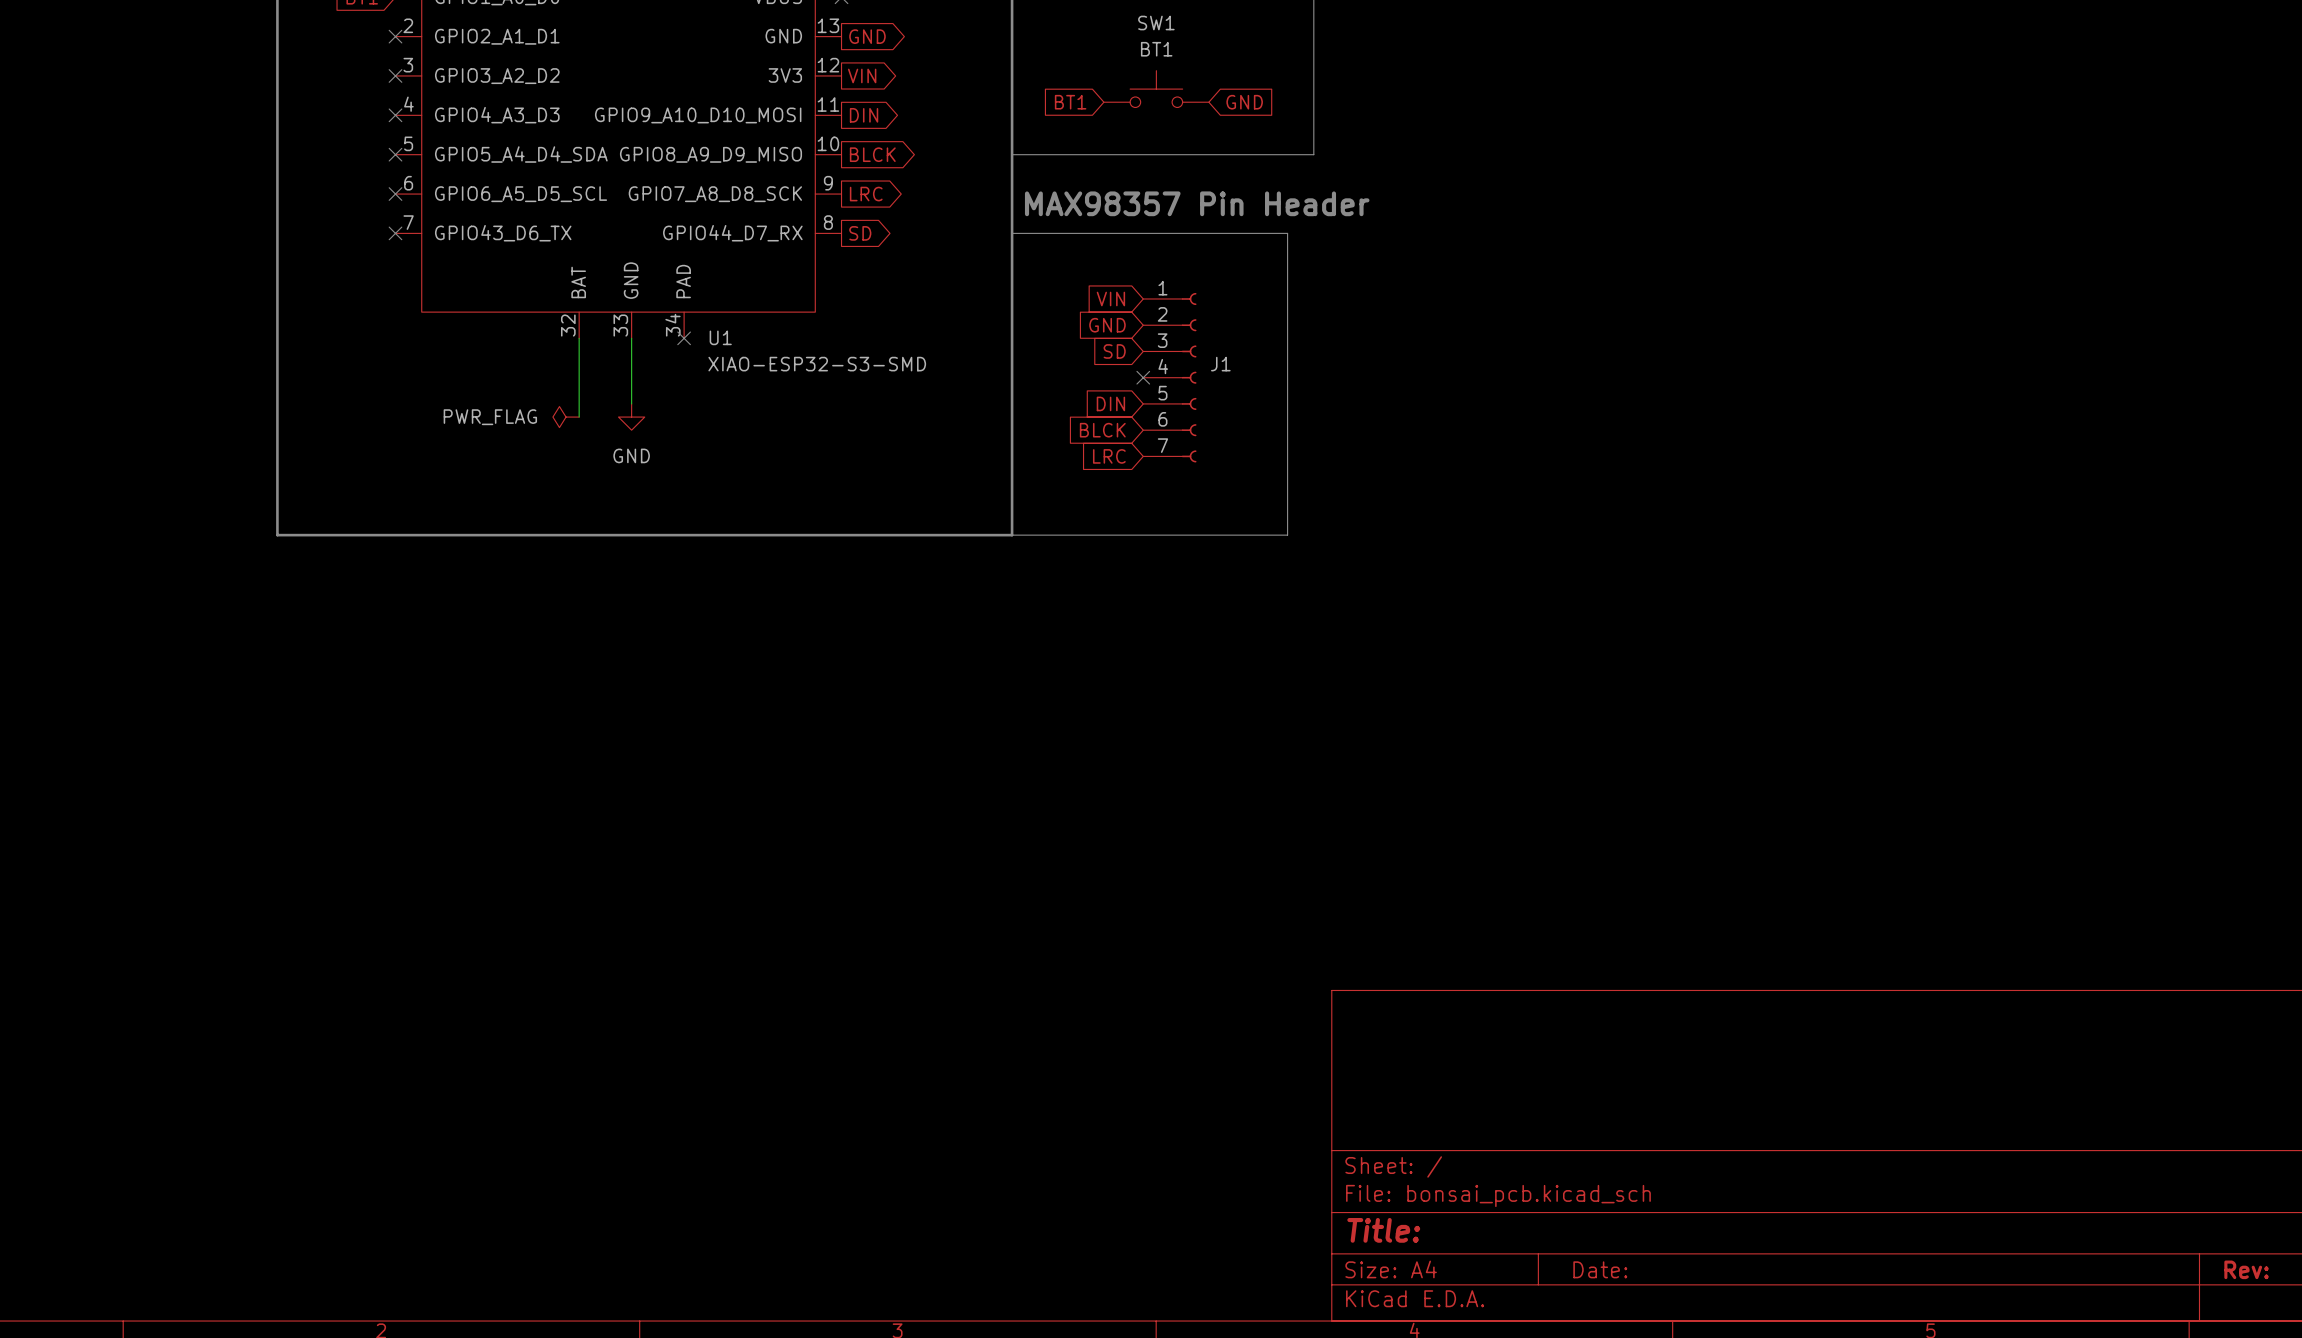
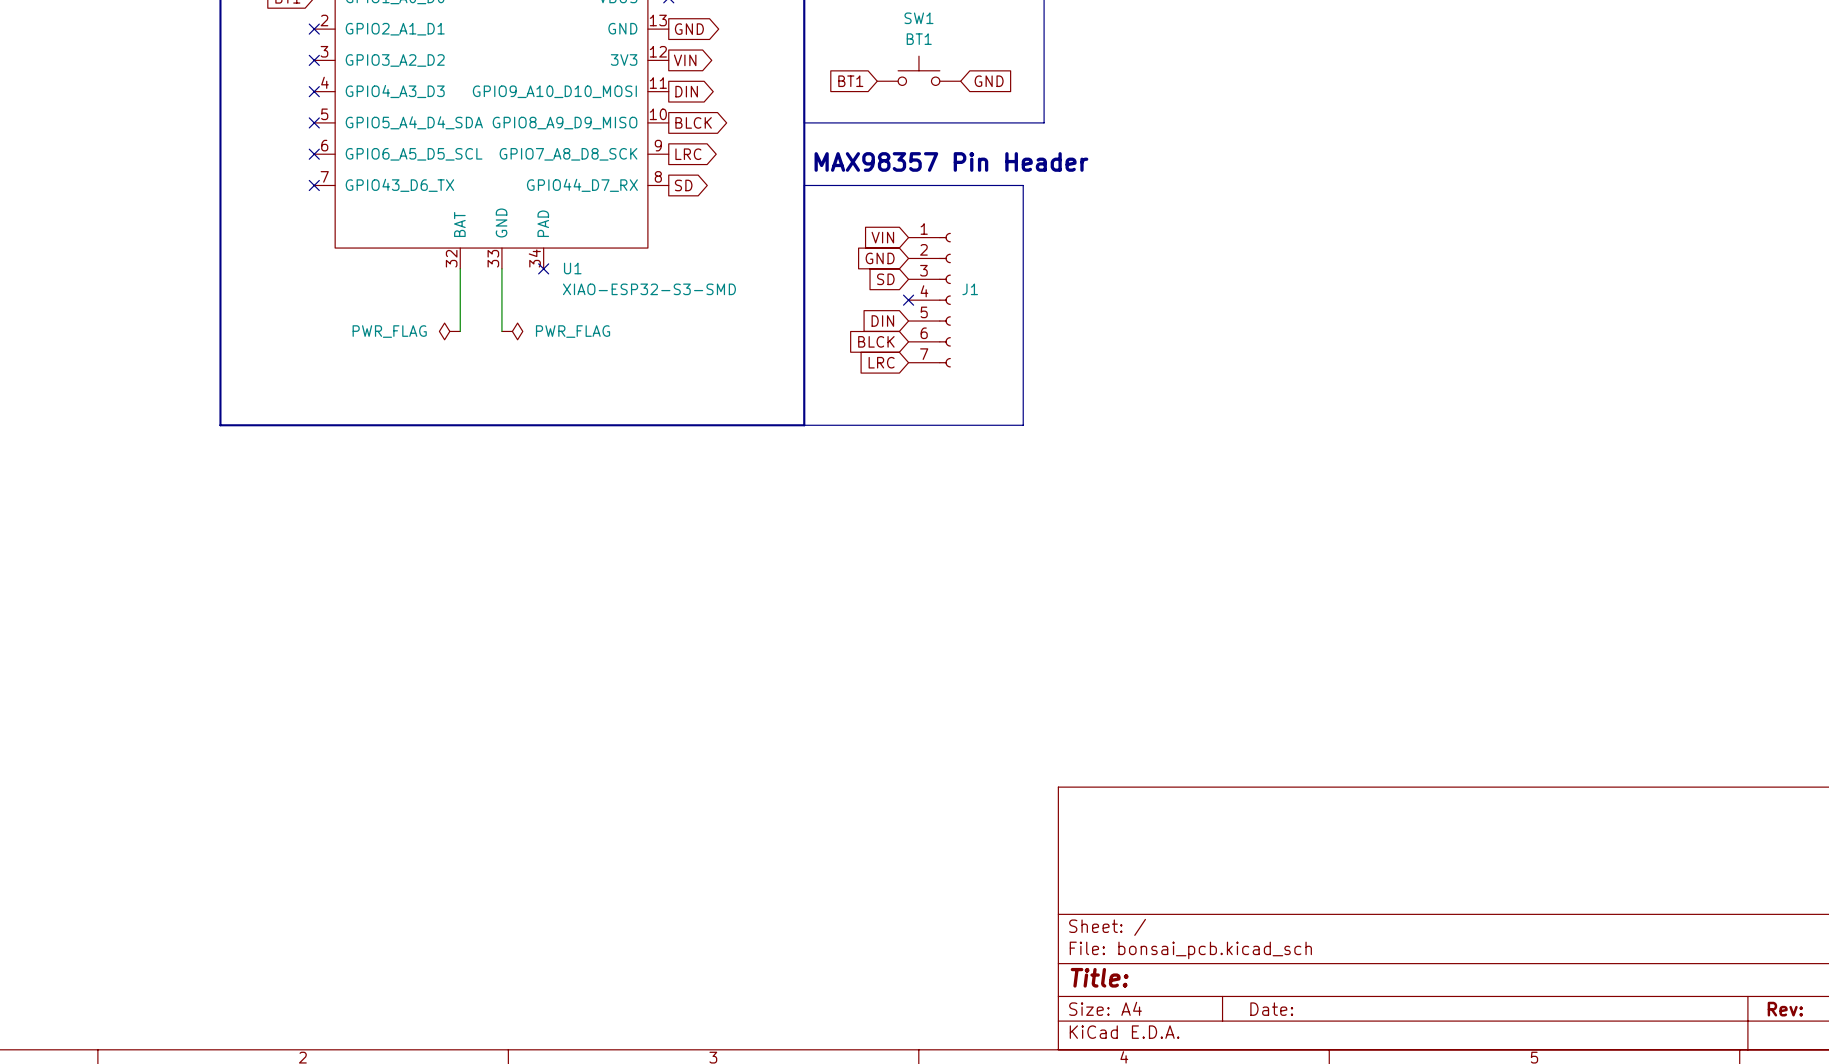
power symbol: GND (631, 417) -> none
power symbol: none -> PWR_FLAG (512, 331)

